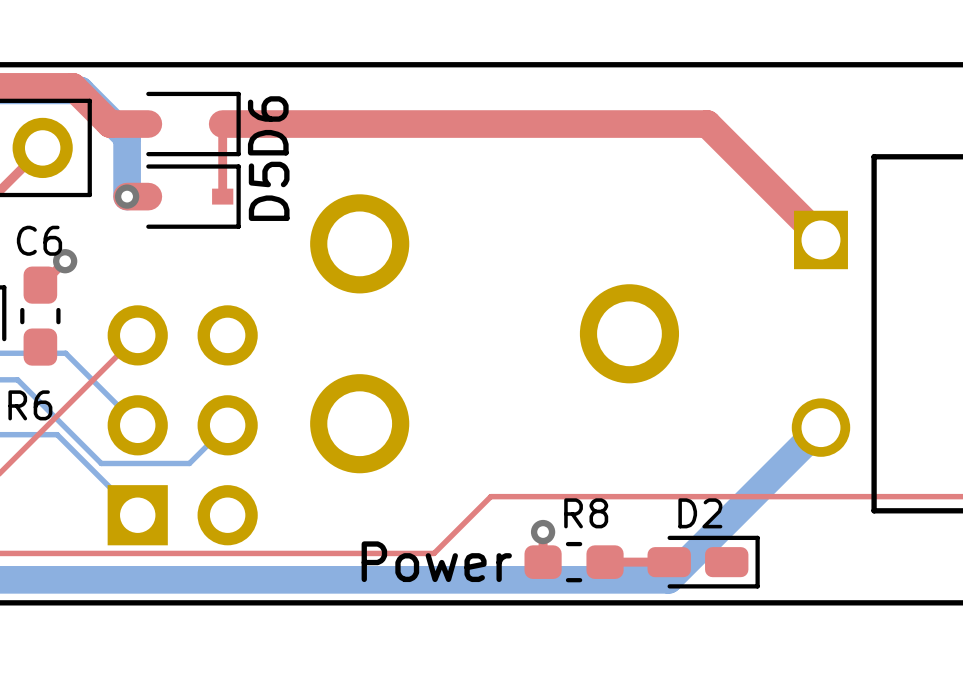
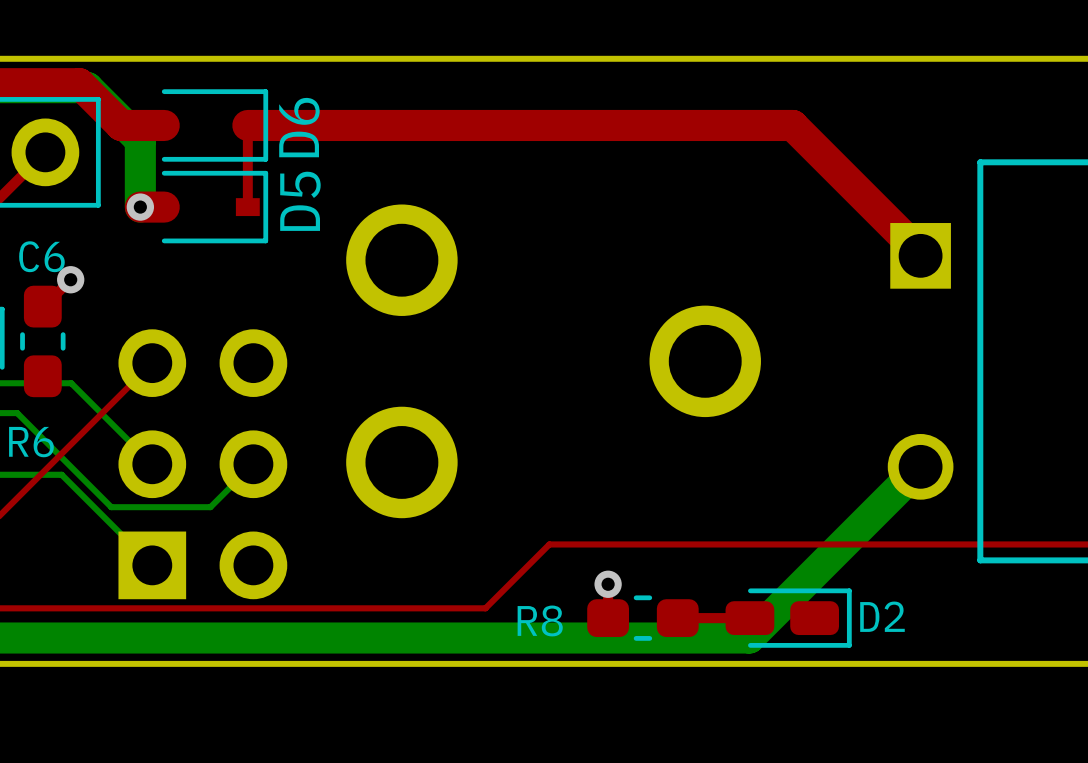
R8 name position: R8 (586, 513) -> R8 (540, 620)
D2 name position: D2 (700, 513) -> D2 (882, 616)
text: Power (436, 561) -> none

